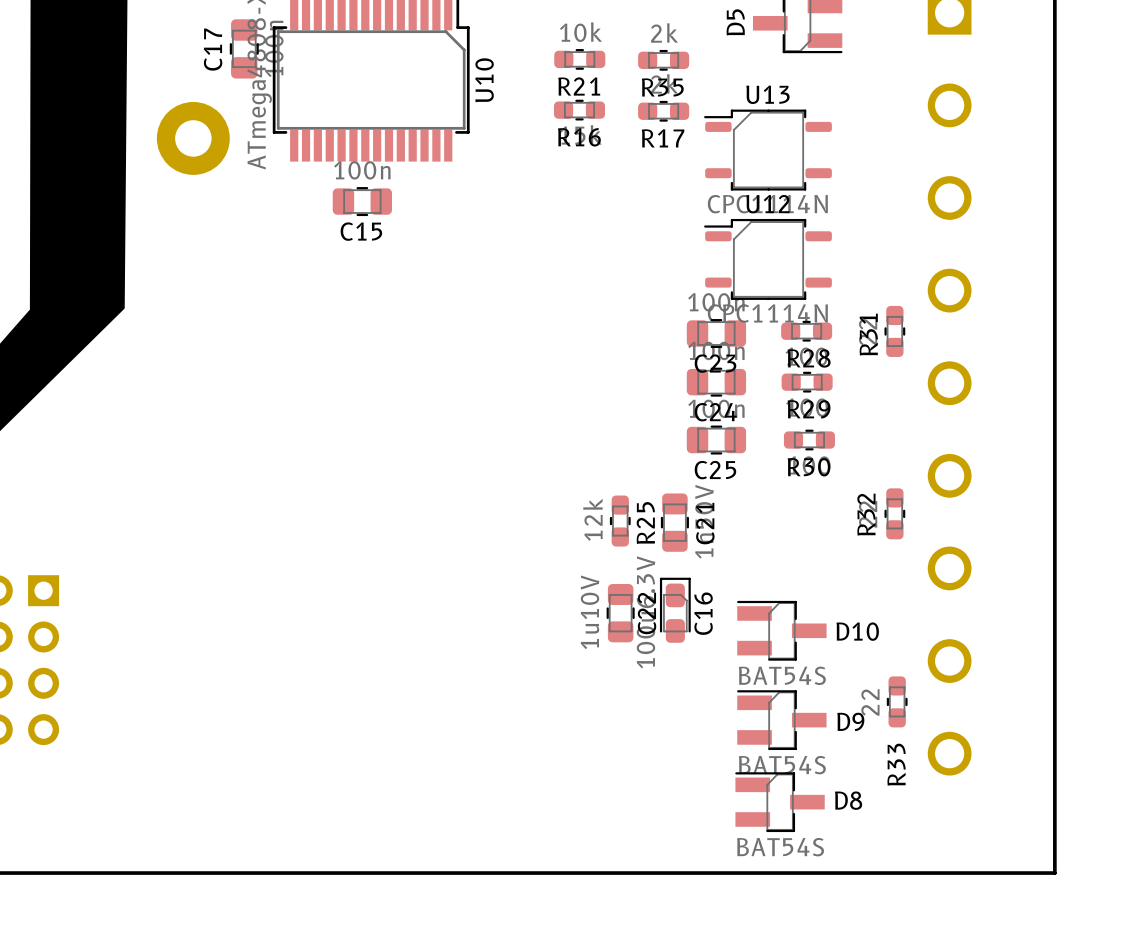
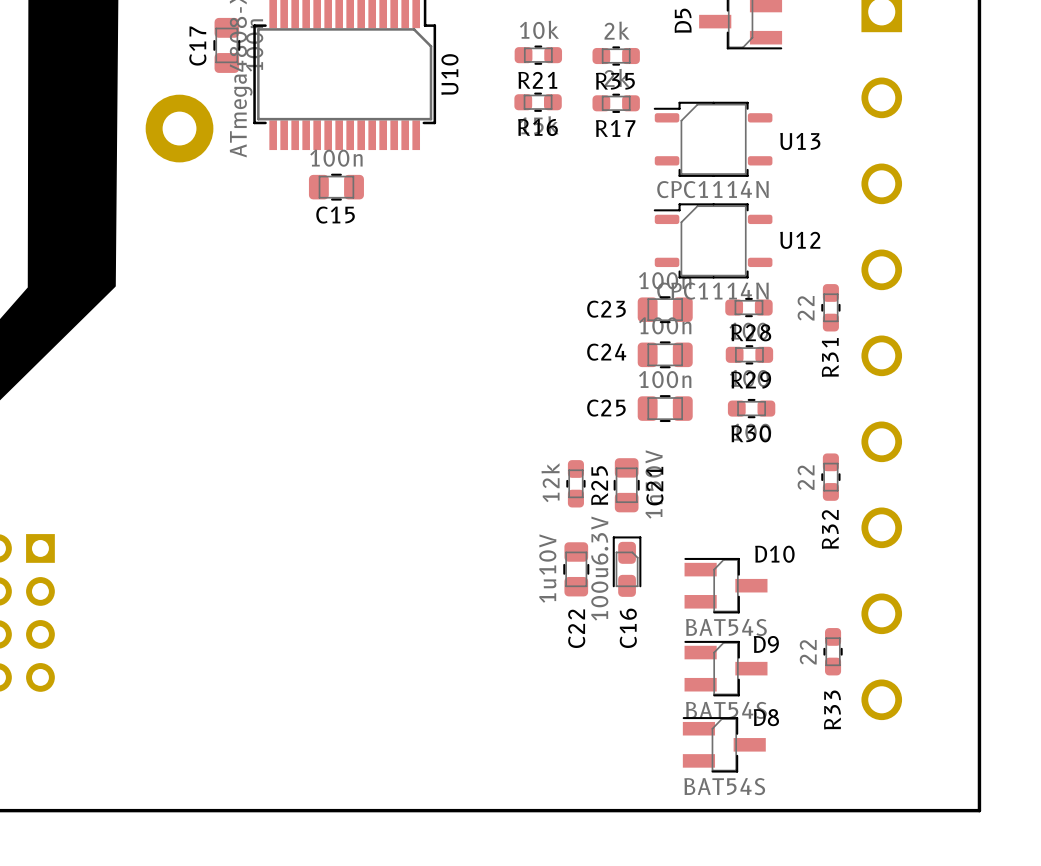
U13 name position: U13 (767, 94) -> U13 (800, 141)
U12 name position: U12 (767, 204) -> U12 (800, 240)
R31 name position: R31 (868, 334) -> R31 (830, 357)
C23 name position: C23 (715, 363) -> C23 (606, 309)
C24 name position: C24 (715, 412) -> C24 (606, 352)
C25 name position: C25 (715, 470) -> C25 (606, 408)
R32 name position: R32 (866, 514) -> R32 (830, 529)
C22 name position: C22 (647, 613) -> C22 (576, 628)
C16 name position: C16 (703, 613) -> C16 (628, 628)
D10 name position: D10 (857, 631) -> D10 (774, 554)
D9 name position: D9 (850, 721) -> D9 (766, 644)
D8 name position: D8 (848, 800) -> D8 (766, 717)

